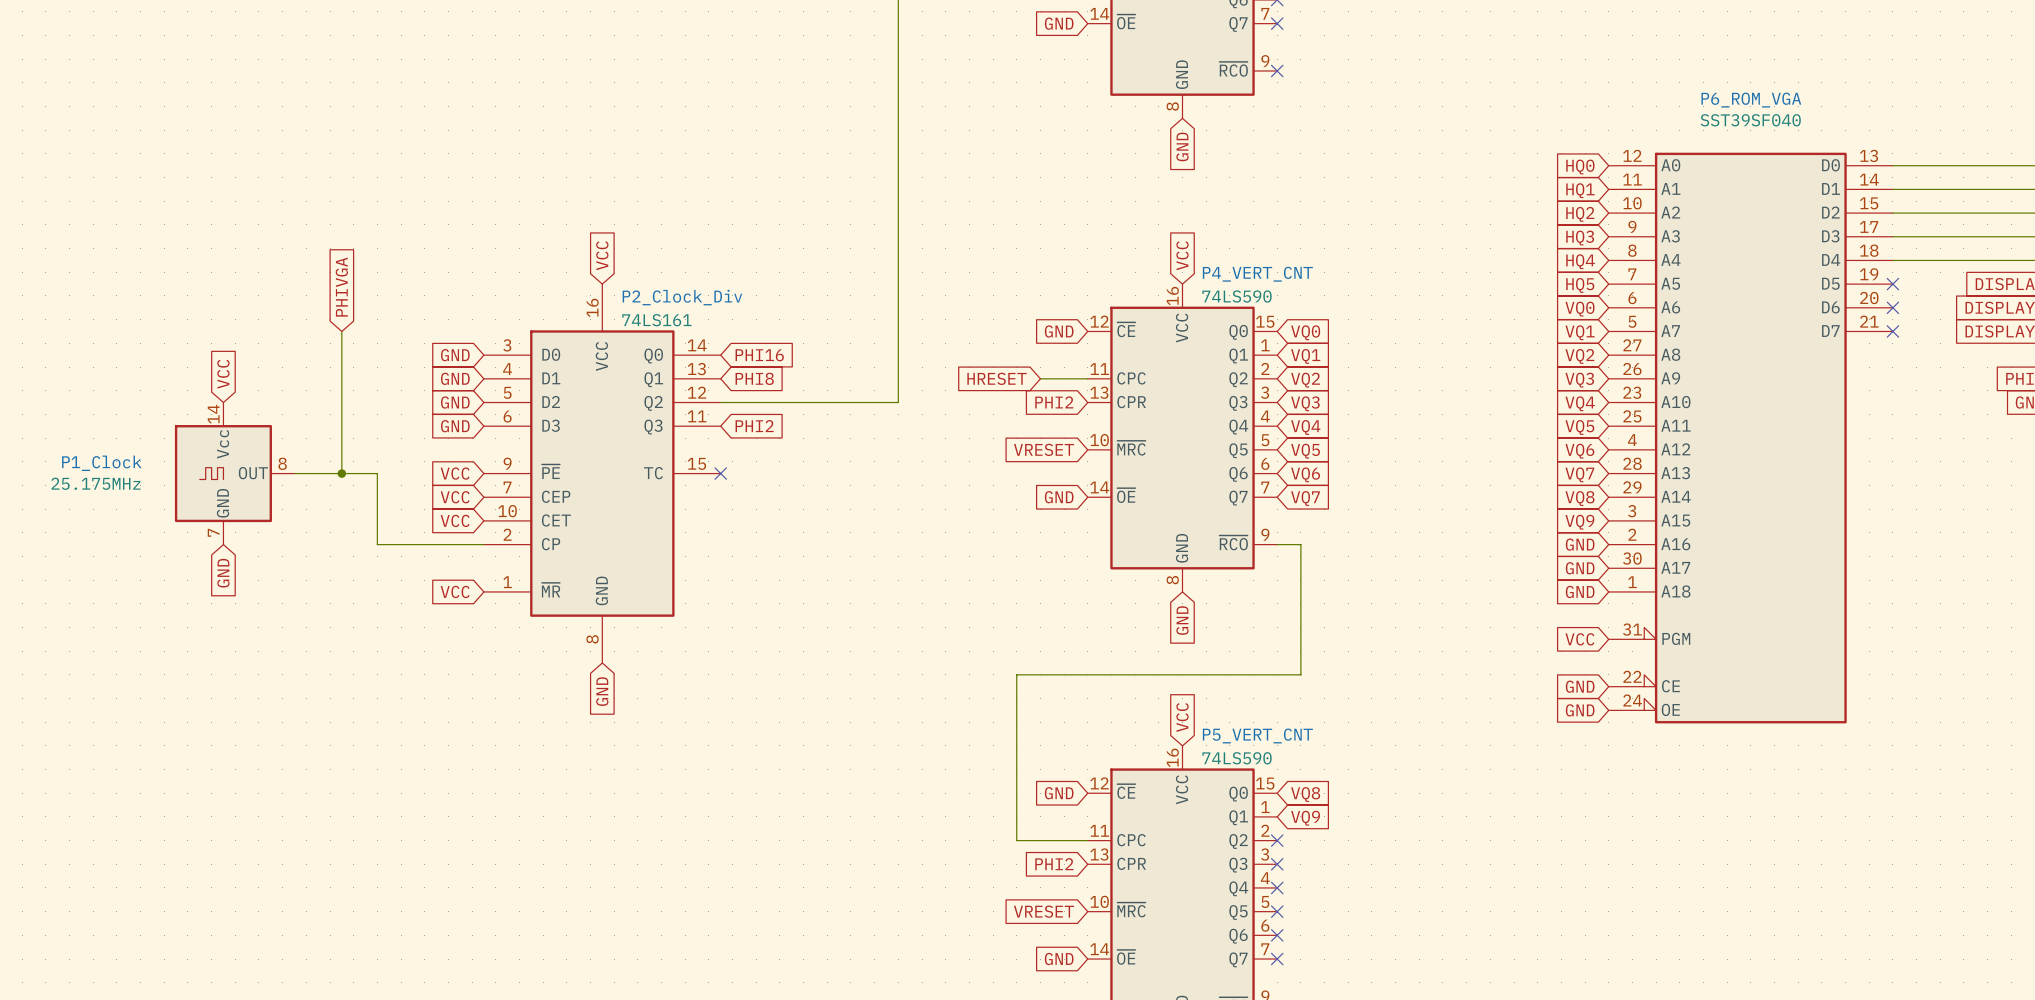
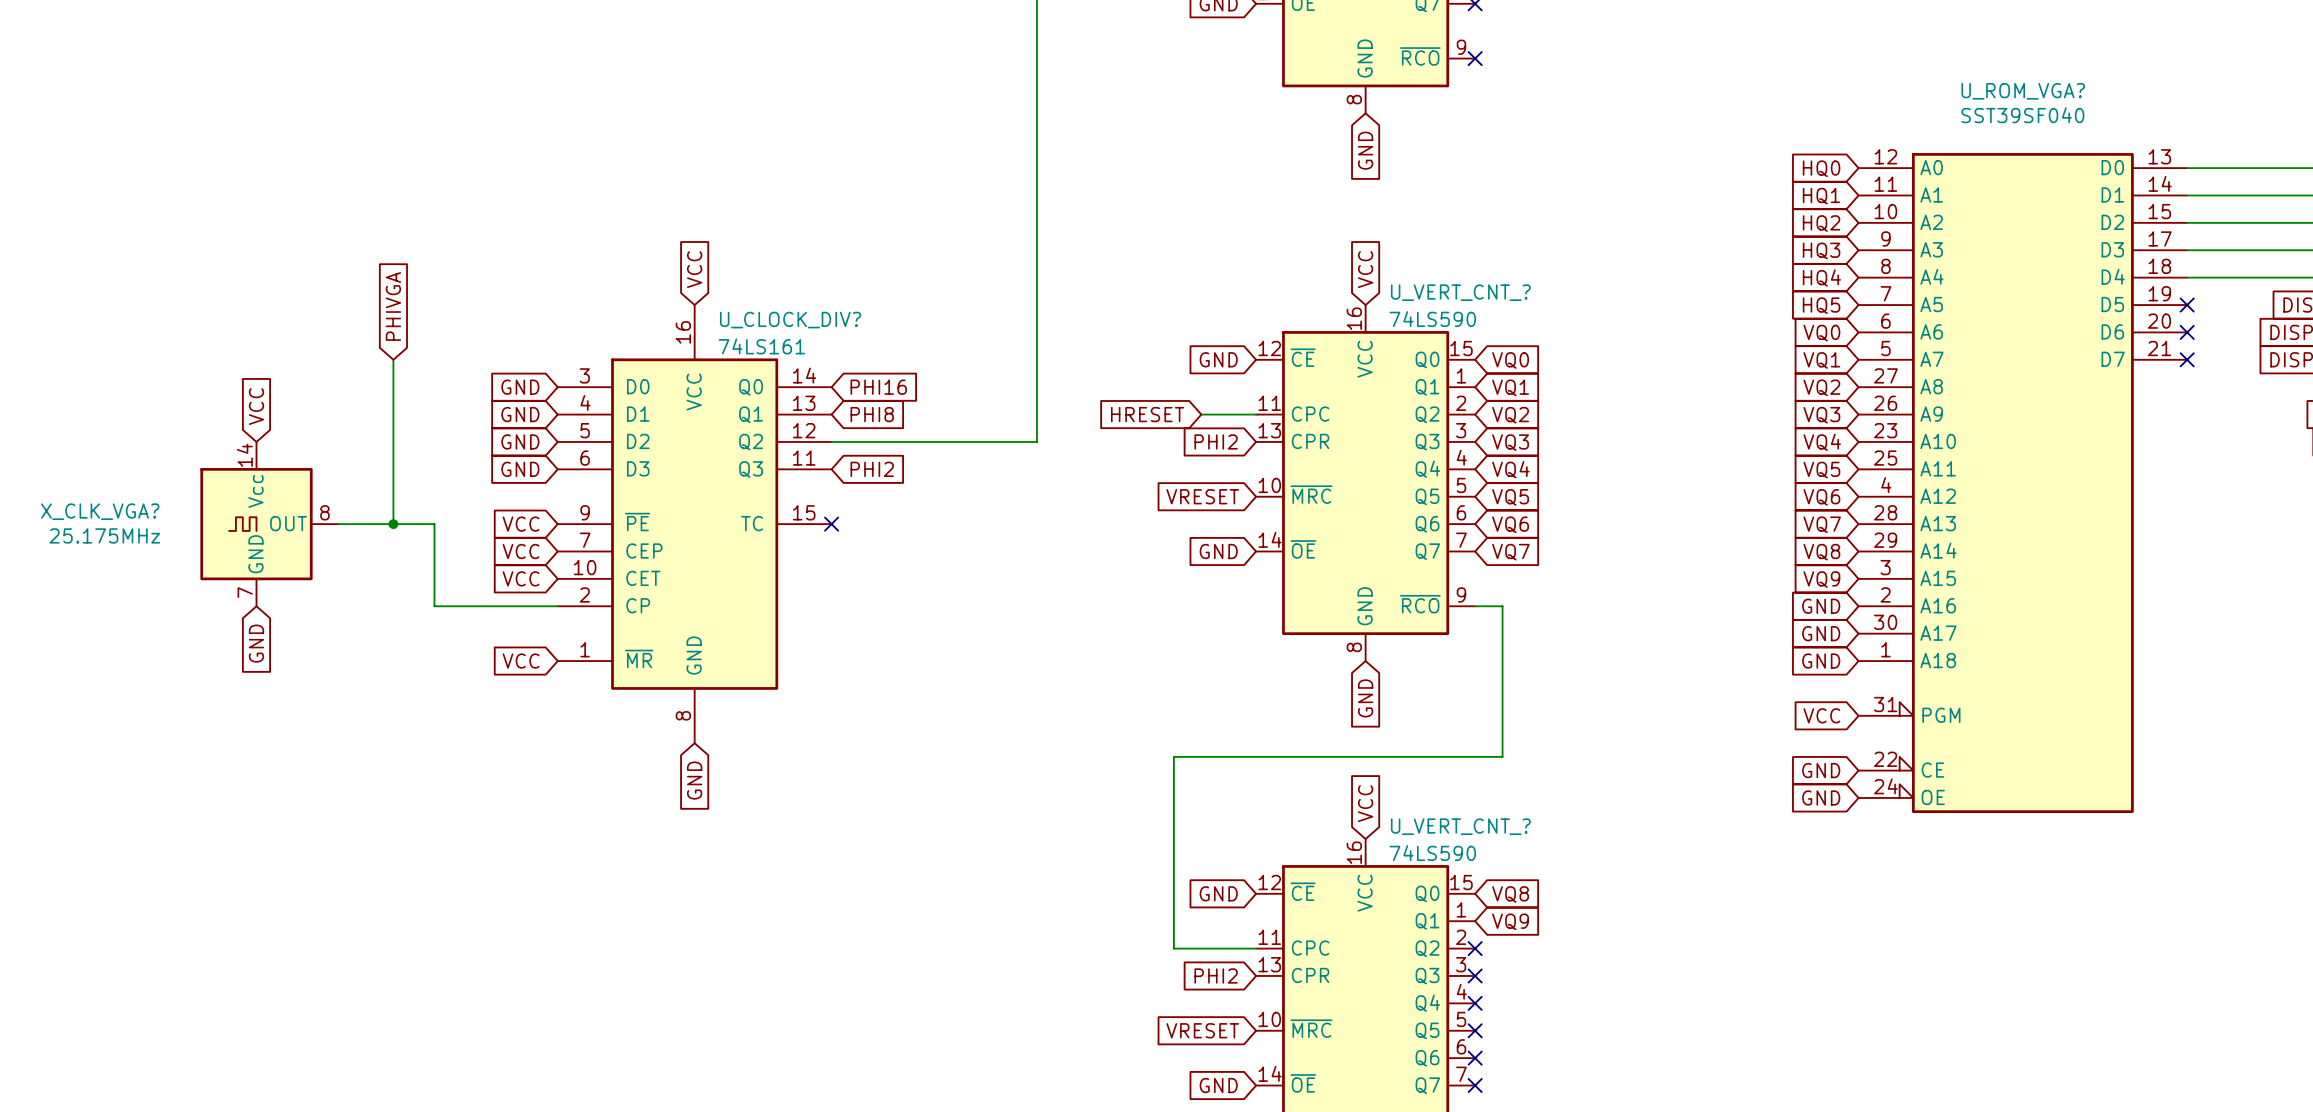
P6_ROM_VGA name: P6_ROM_VGA (1751, 100) -> U_ROM_VGA? (2023, 91)
P4_VERT_CNT name: P4_VERT_CNT (1257, 274) -> U_VERT_CNT_? (1460, 292)
P2_Clock_Div name: P2_Clock_Div (682, 297) -> U_CLOCK_DIV? (790, 320)
P1_Clock name: P1_Clock (101, 463) -> X_CLK_VGA? (100, 511)
P5_VERT_CNT name: P5_VERT_CNT (1257, 735) -> U_VERT_CNT_? (1460, 826)

